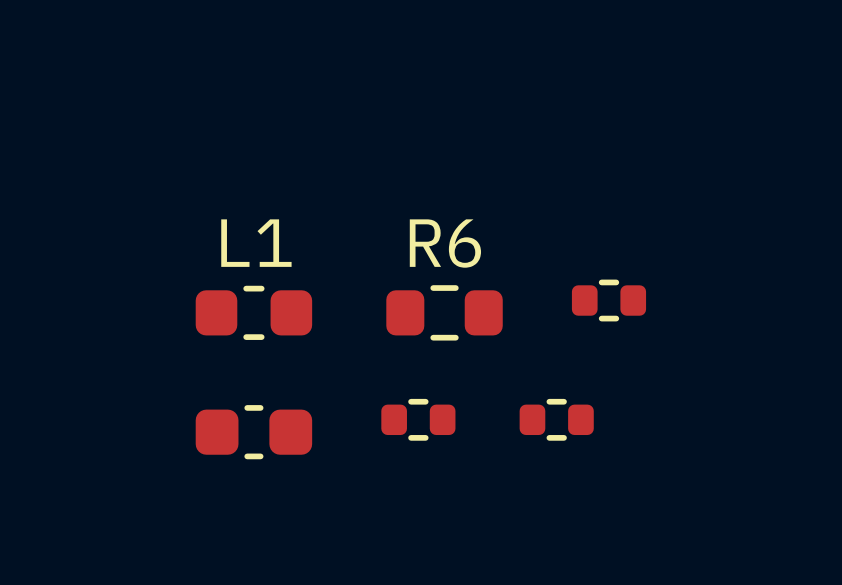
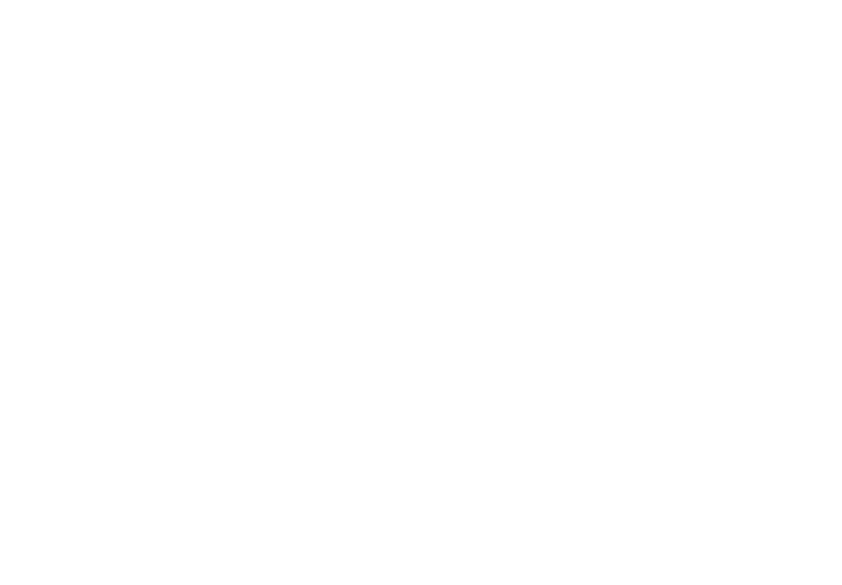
part: (608, 300) -> none
L1: (253, 312) -> none
R6: (444, 312) -> none
part: (418, 419) -> none
part: (556, 419) -> none
part: (253, 432) -> none

